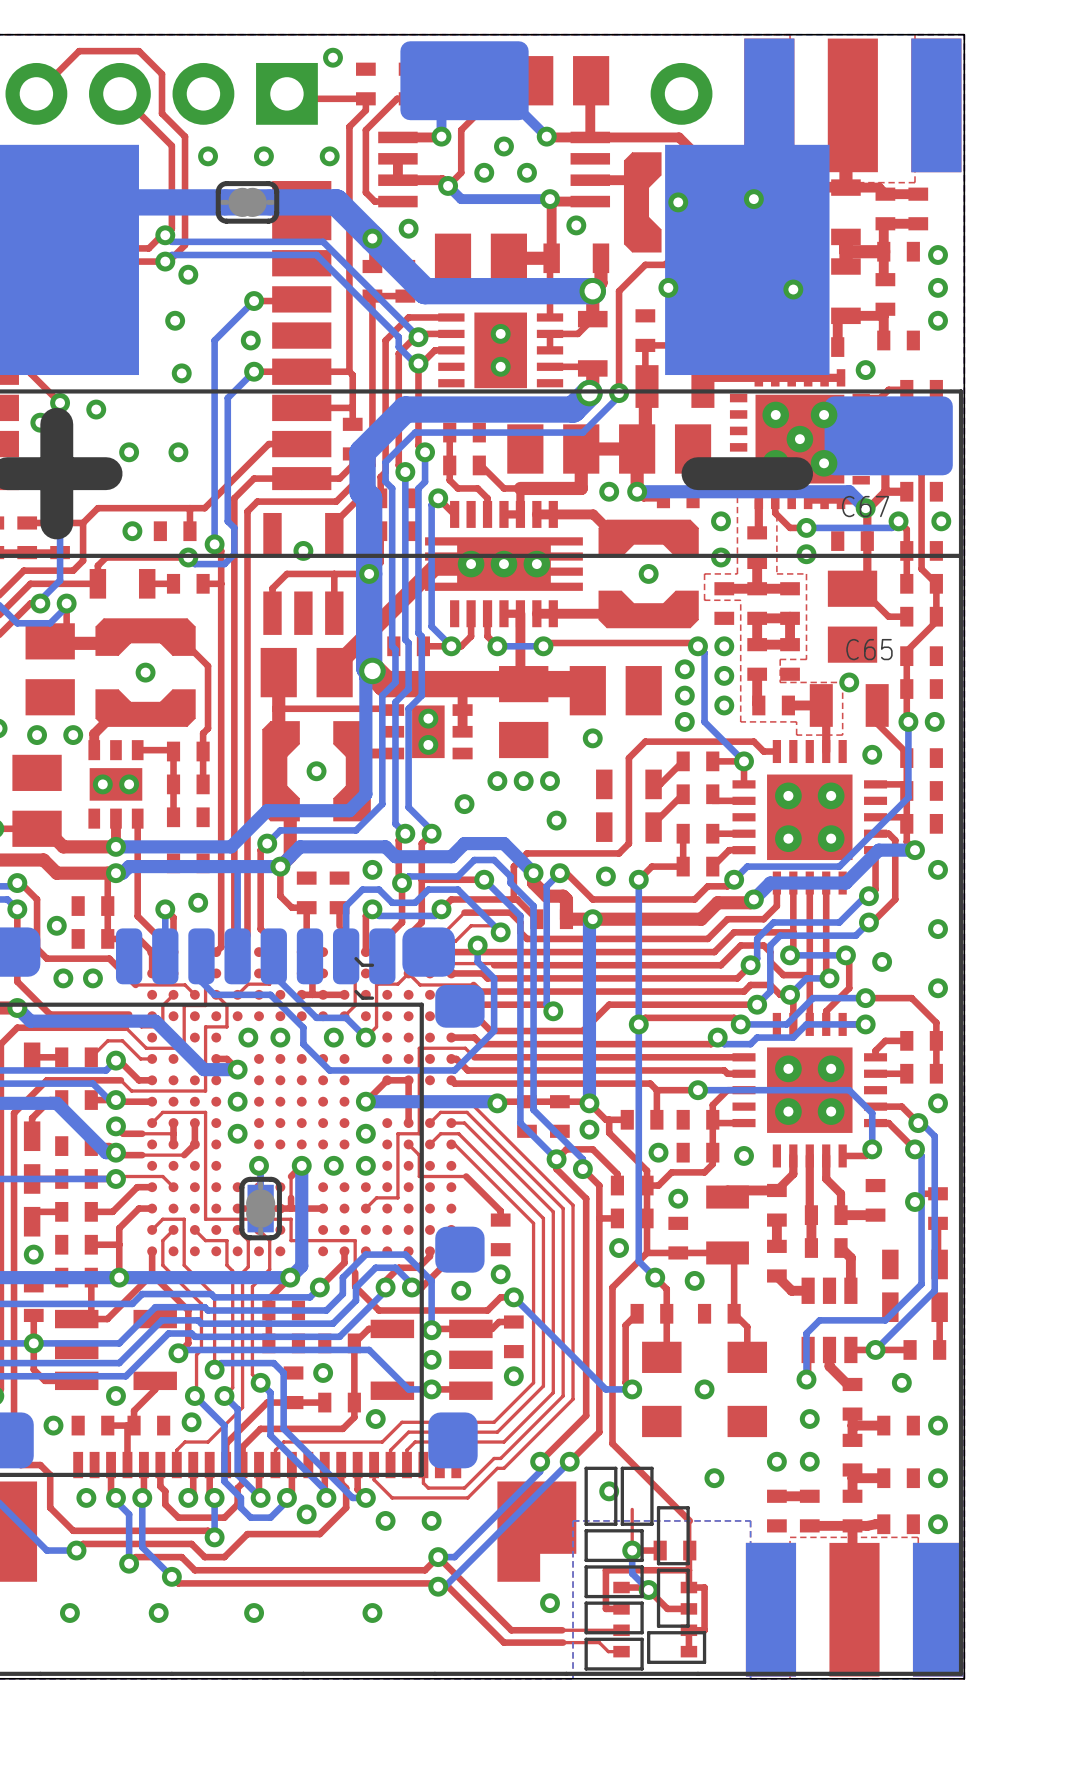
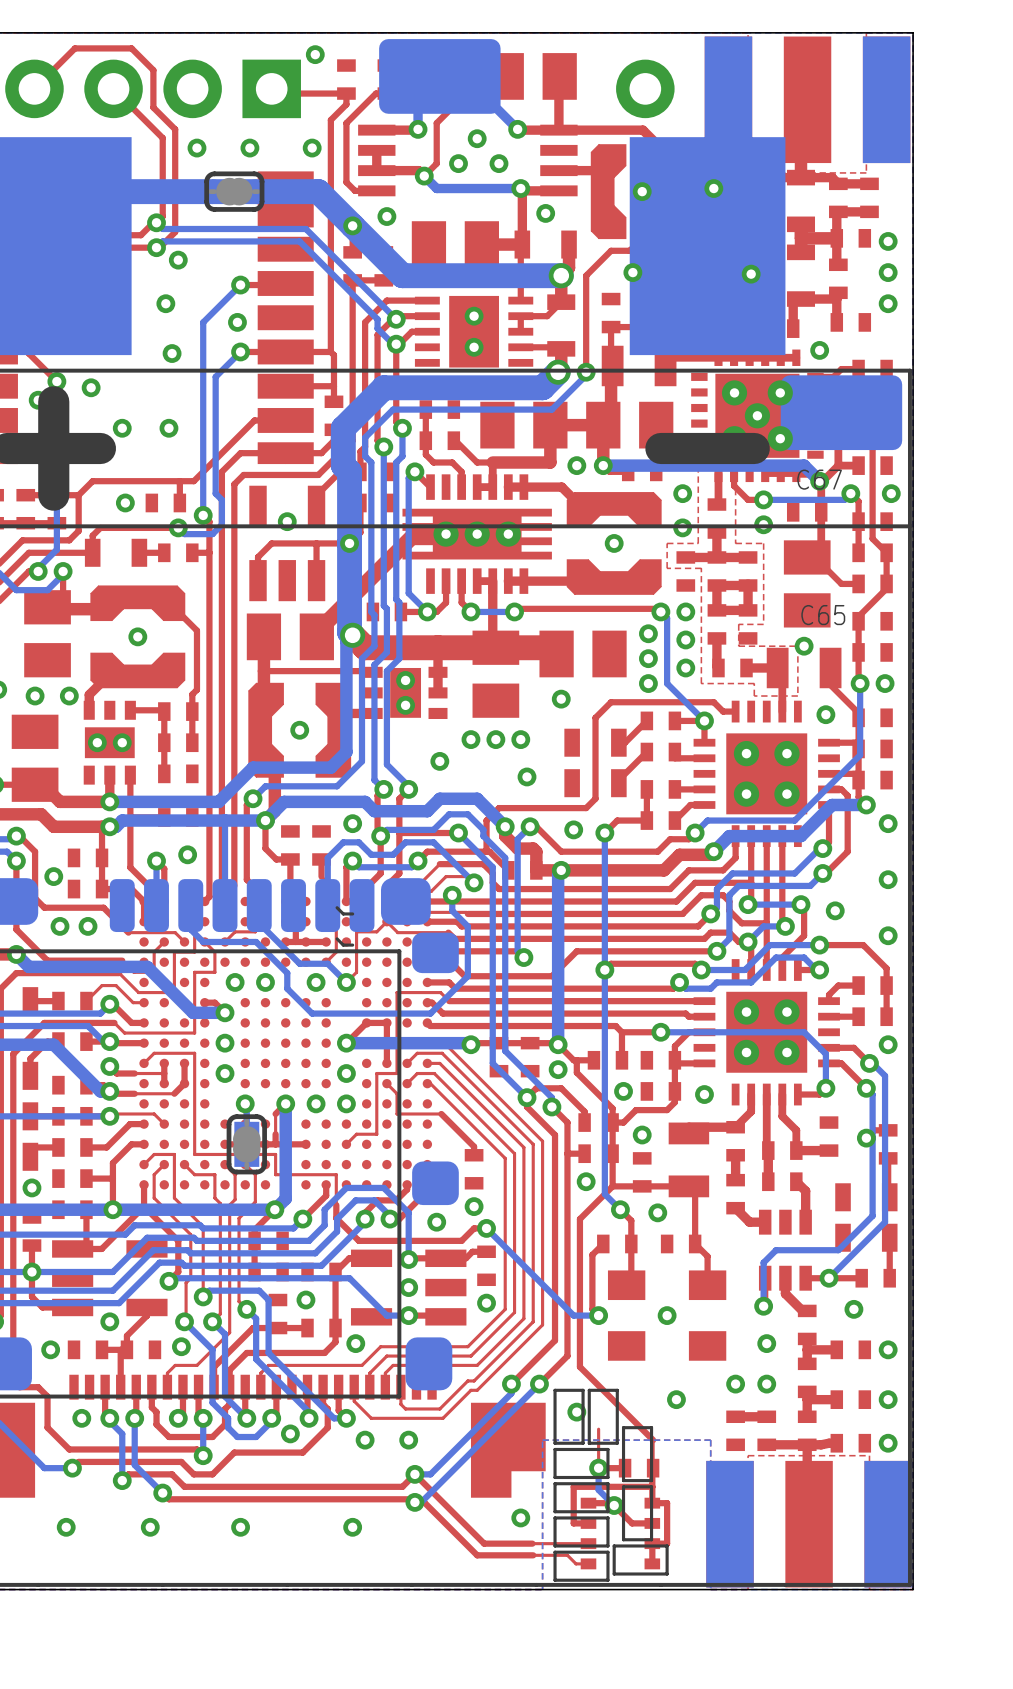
bottom track: (862, 1024) (806, 1024) -> (816, 969) (804, 957) (776, 957) (763, 969)

